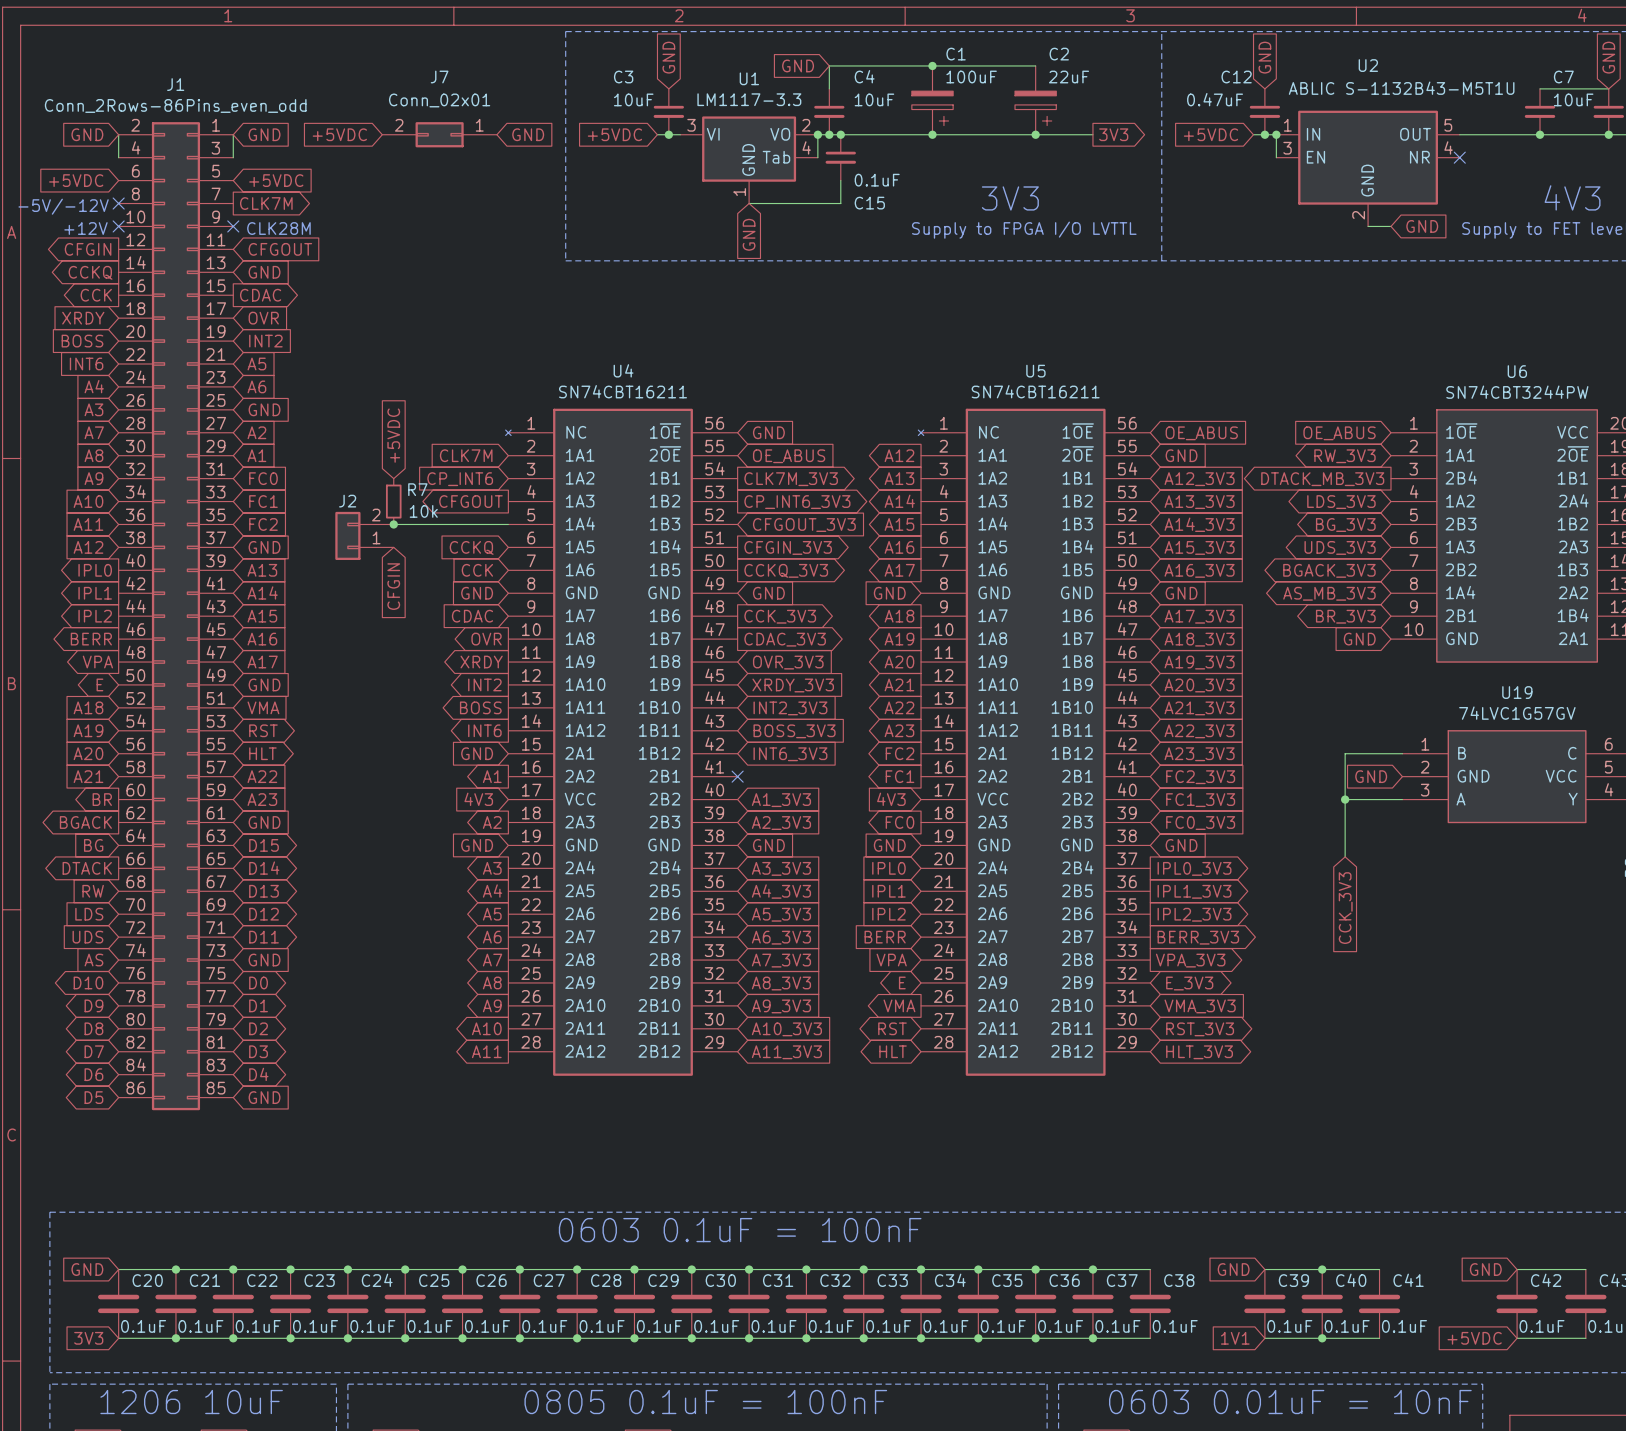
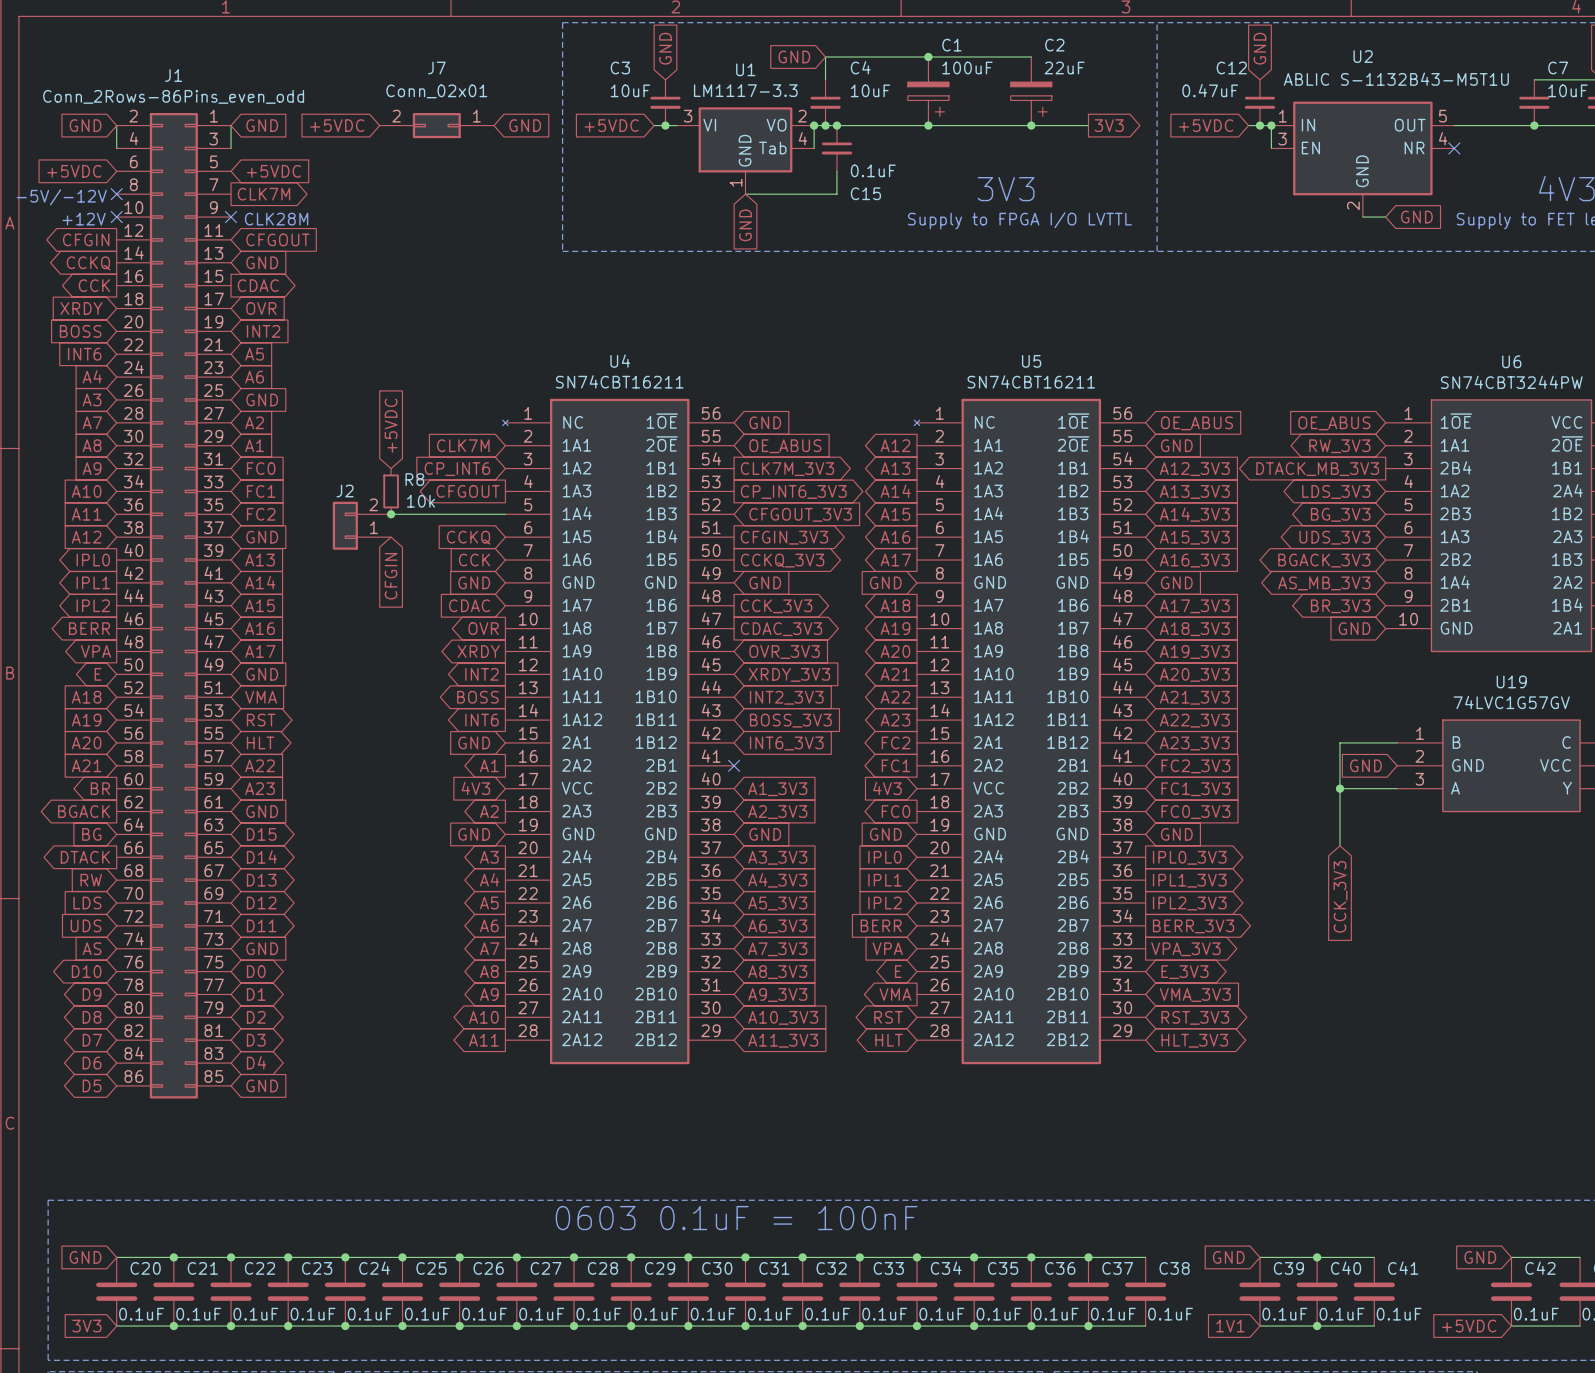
R7 name: R7 (417, 489) -> R8 (414, 479)

